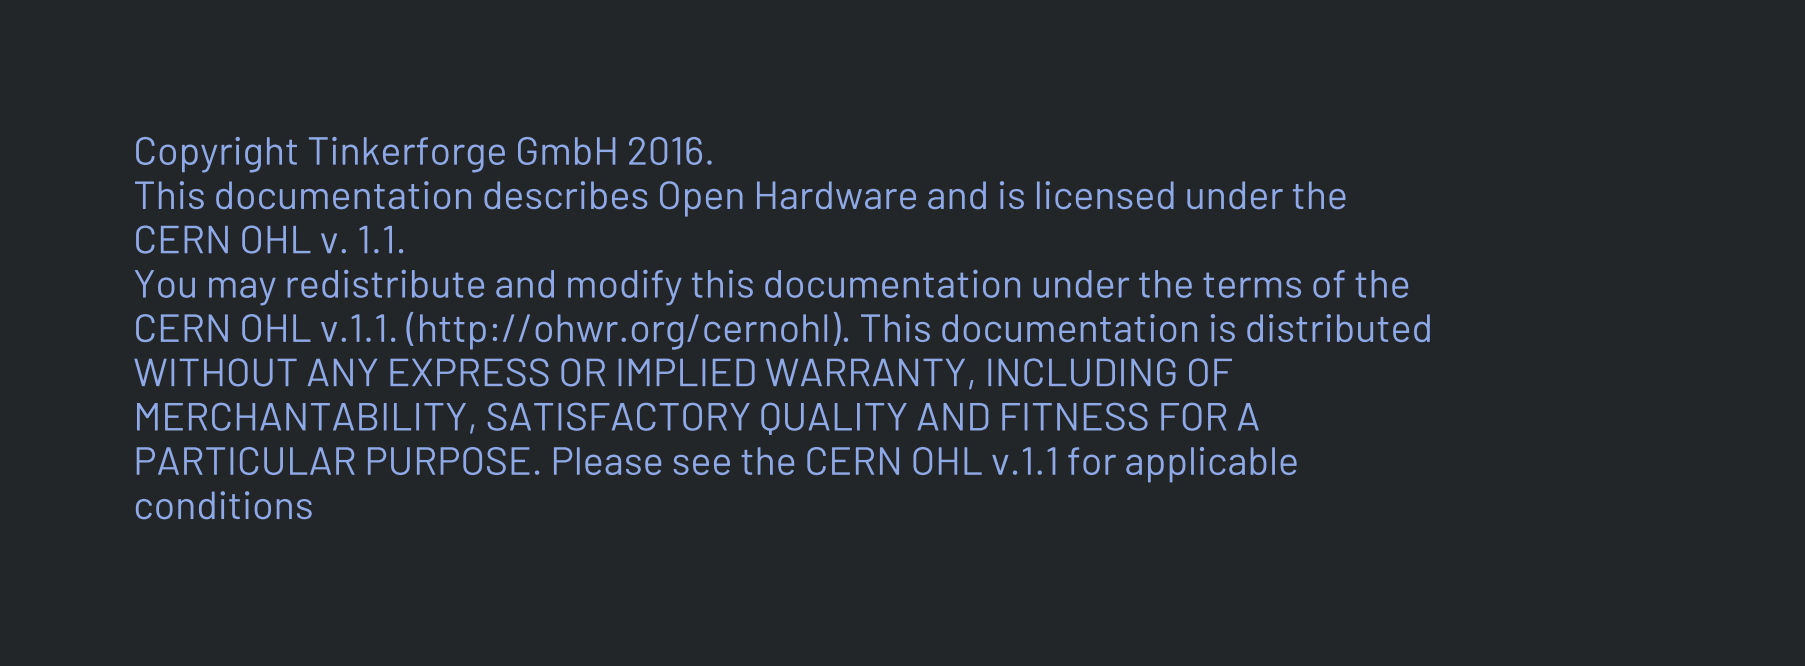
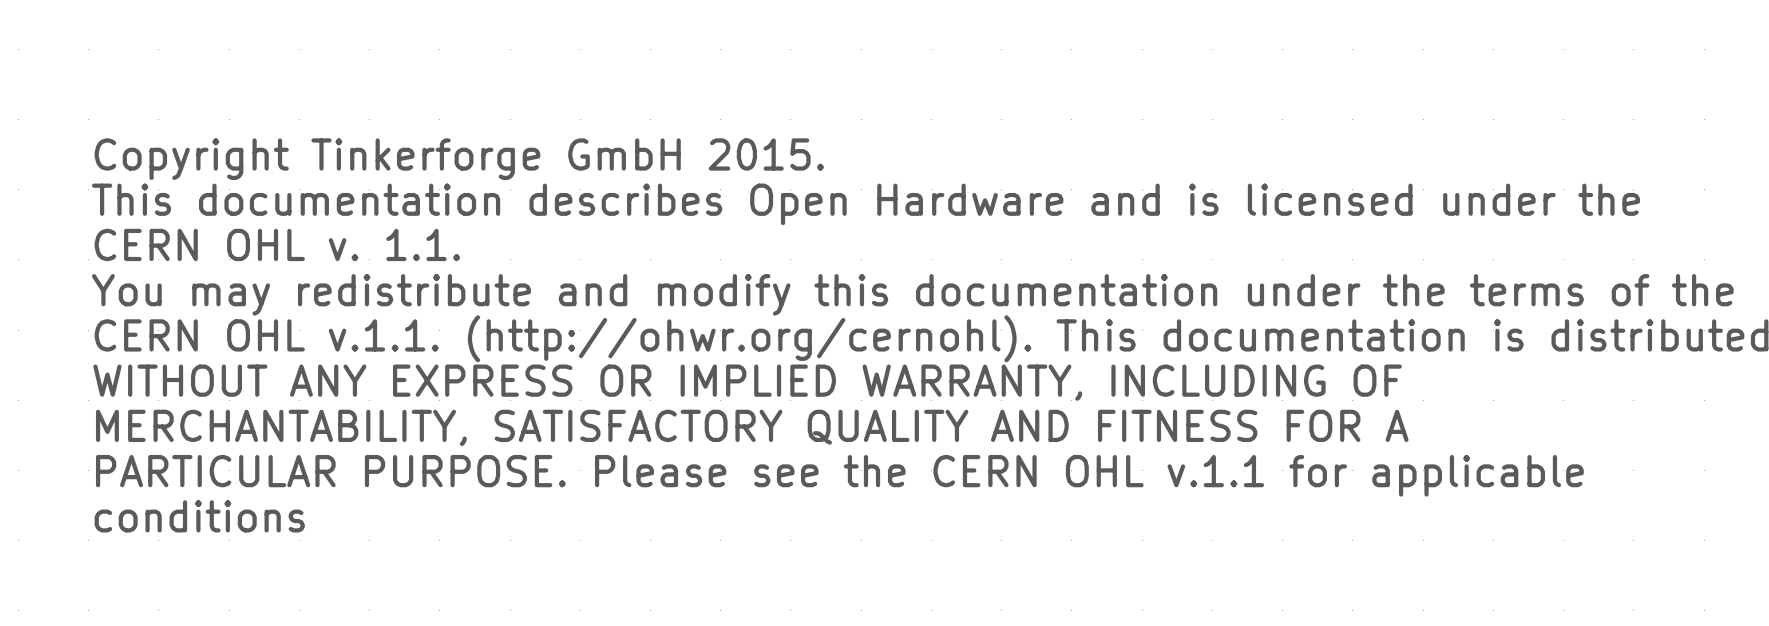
text: Copyright Tinkerforge GmbH 2016. (423, 154) -> Copyright Tinkerforge GmbH 2015. (459, 159)

